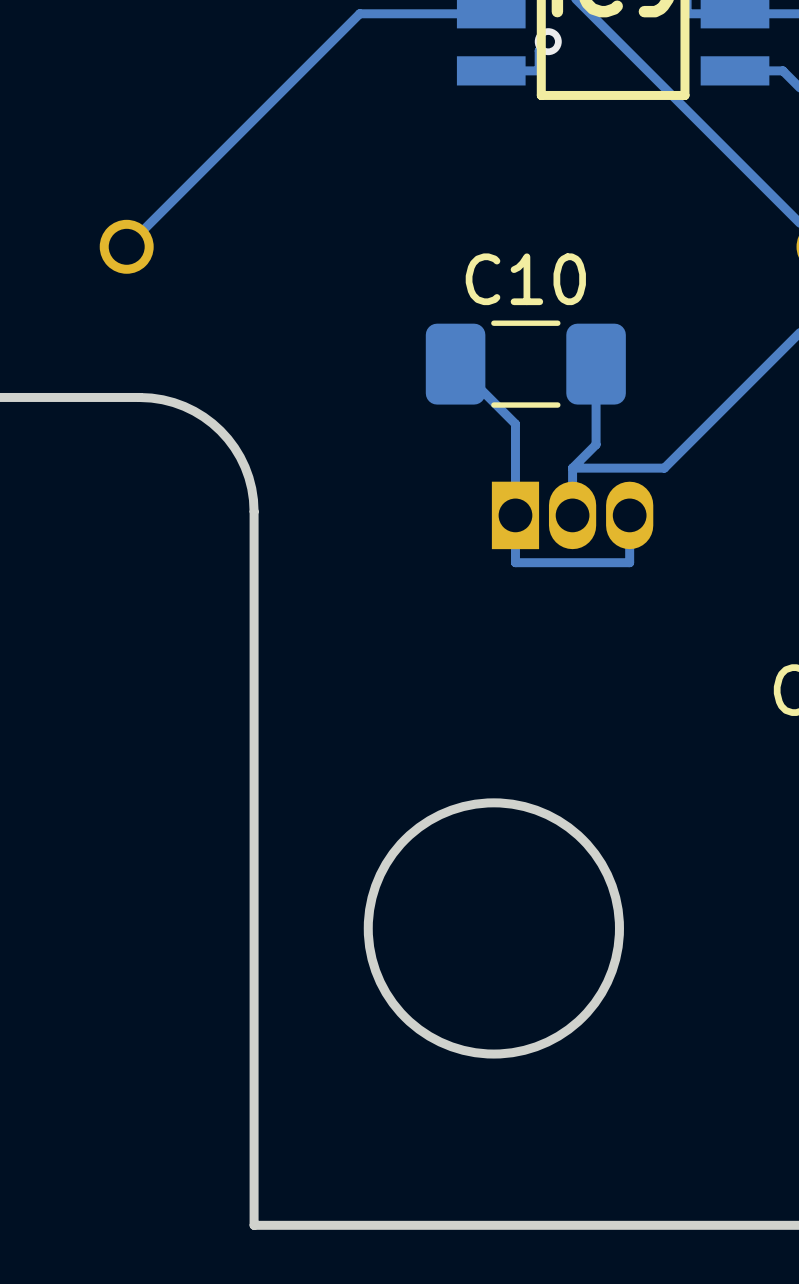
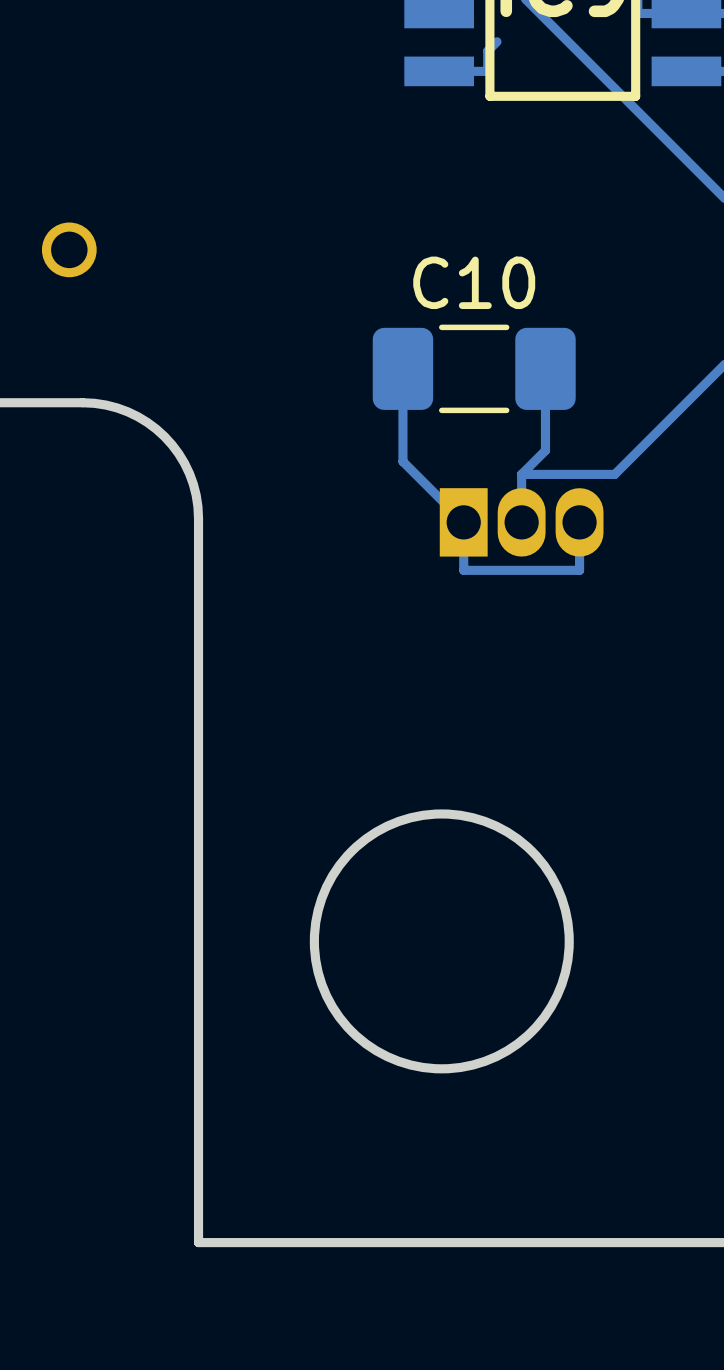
track: (491, 13) (359, 13) (126, 246) -> none
via: (548, 41) -> none
track: (455, 364) (515, 424) (515, 515) -> (402, 368) (402, 461) (463, 522)

